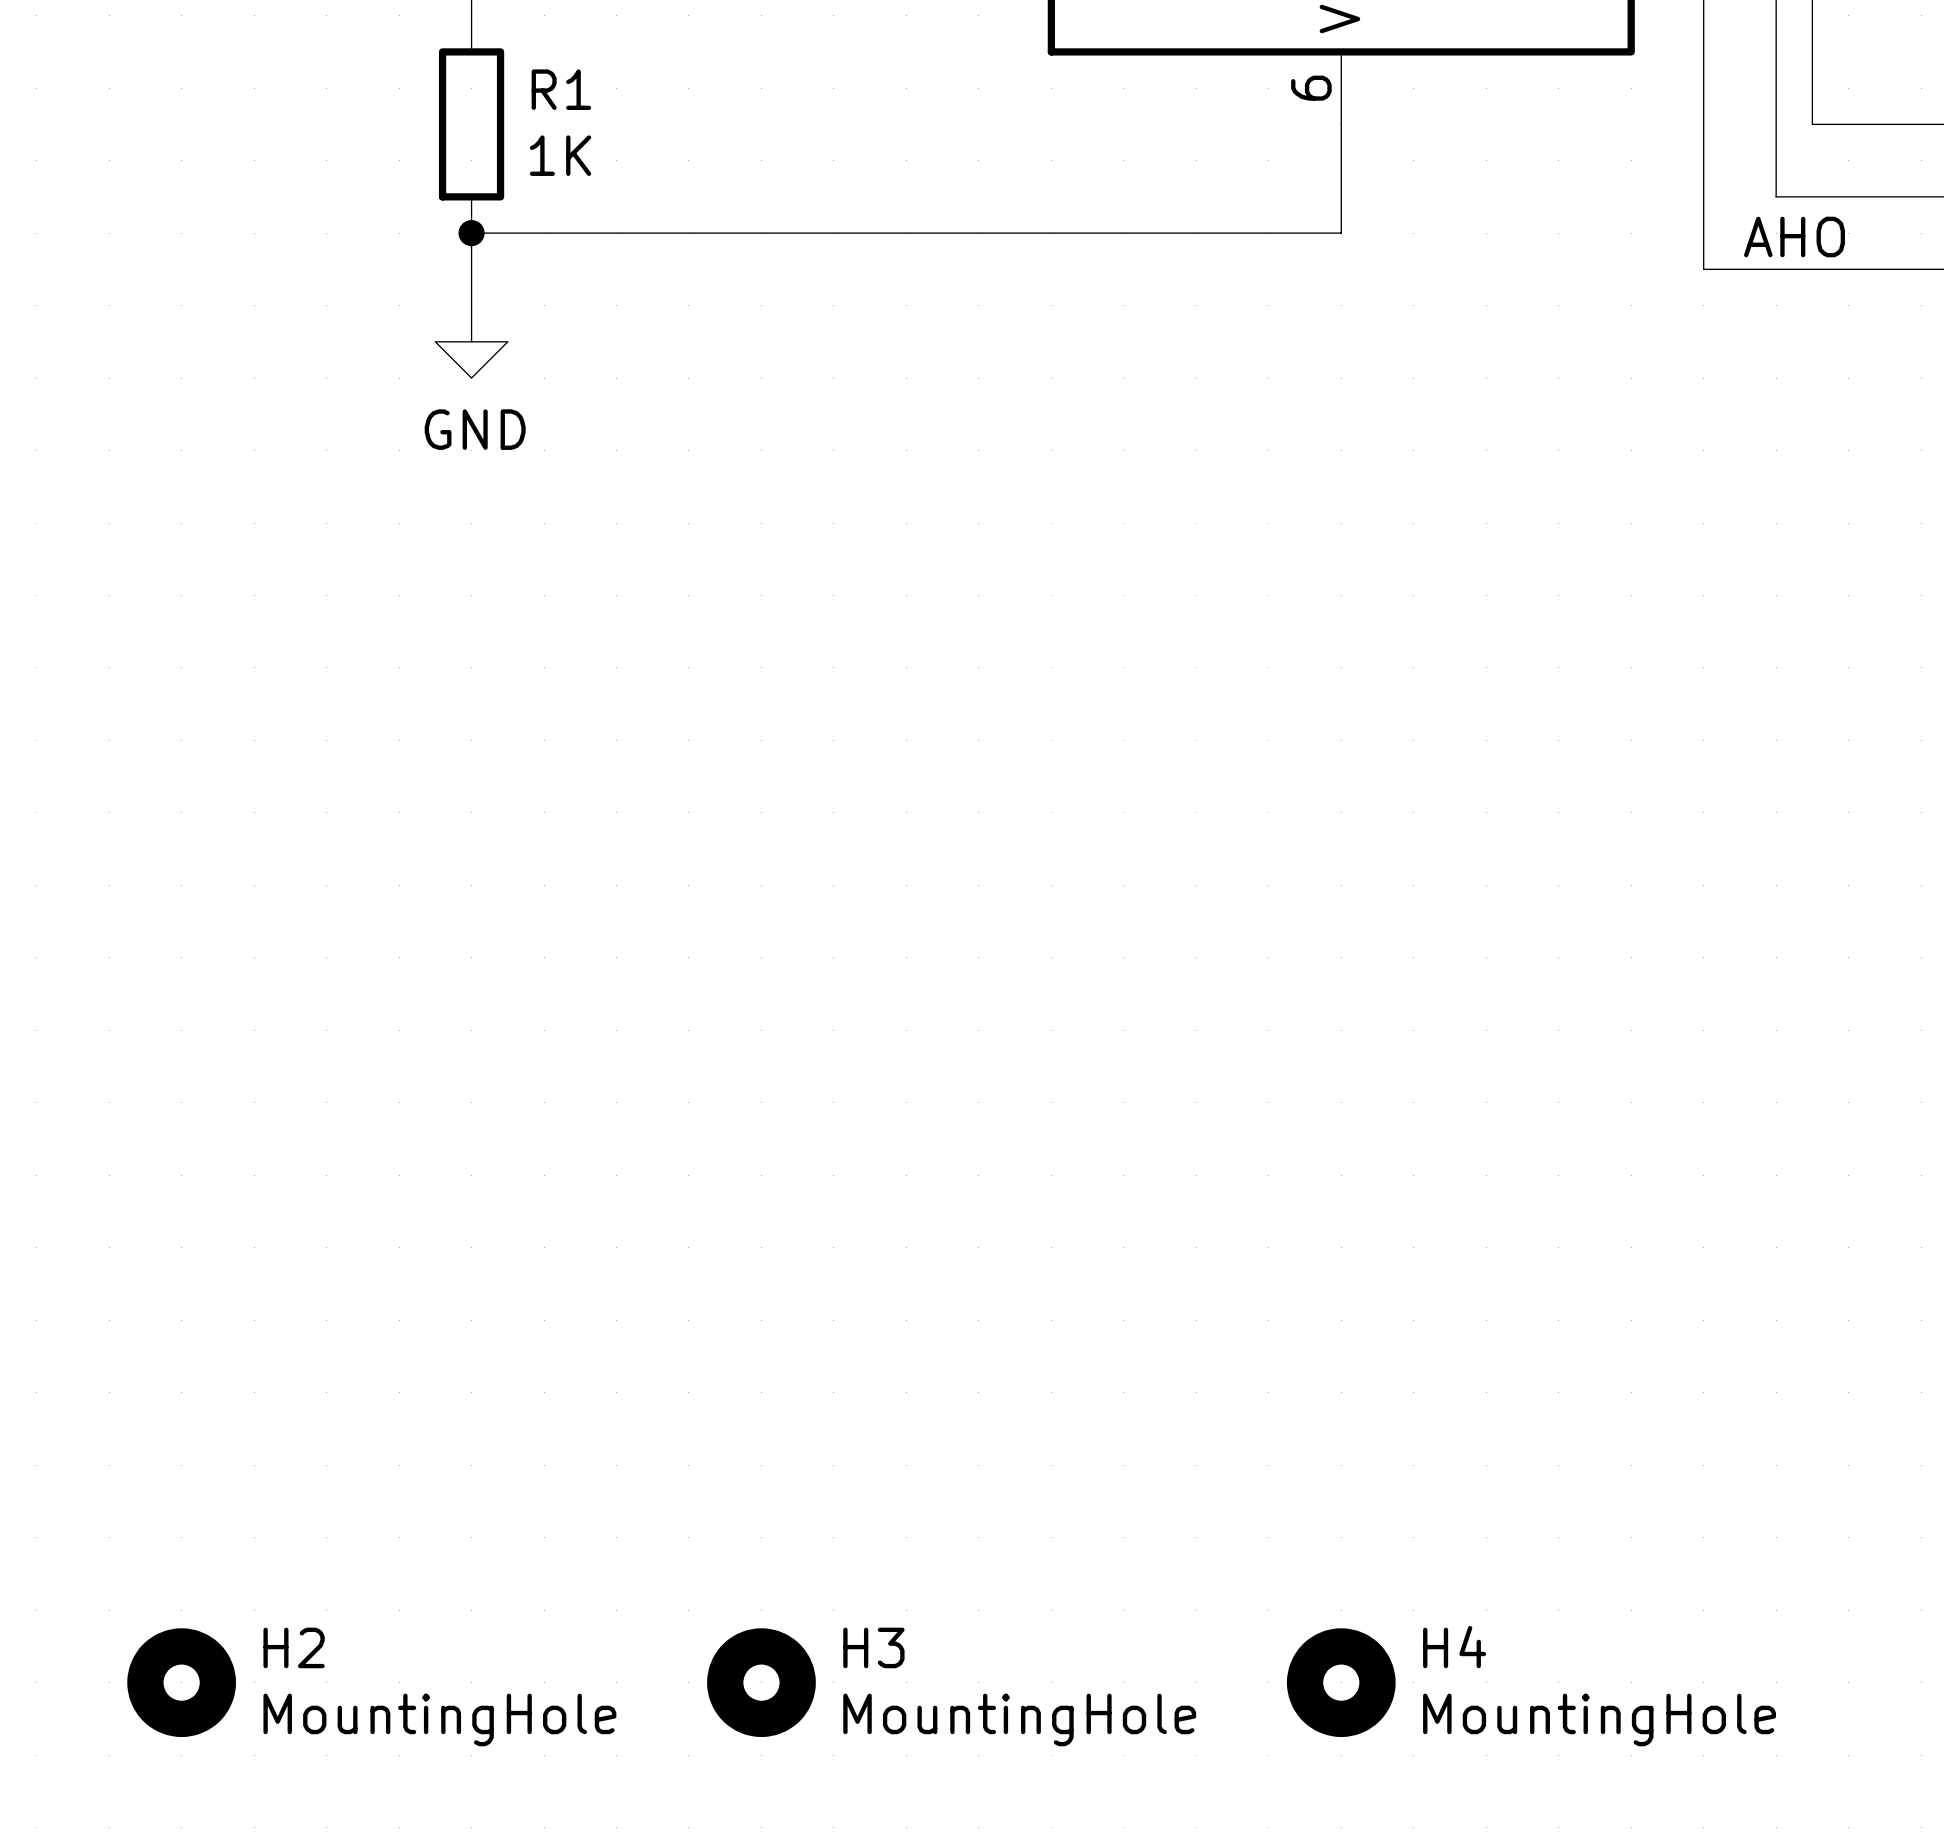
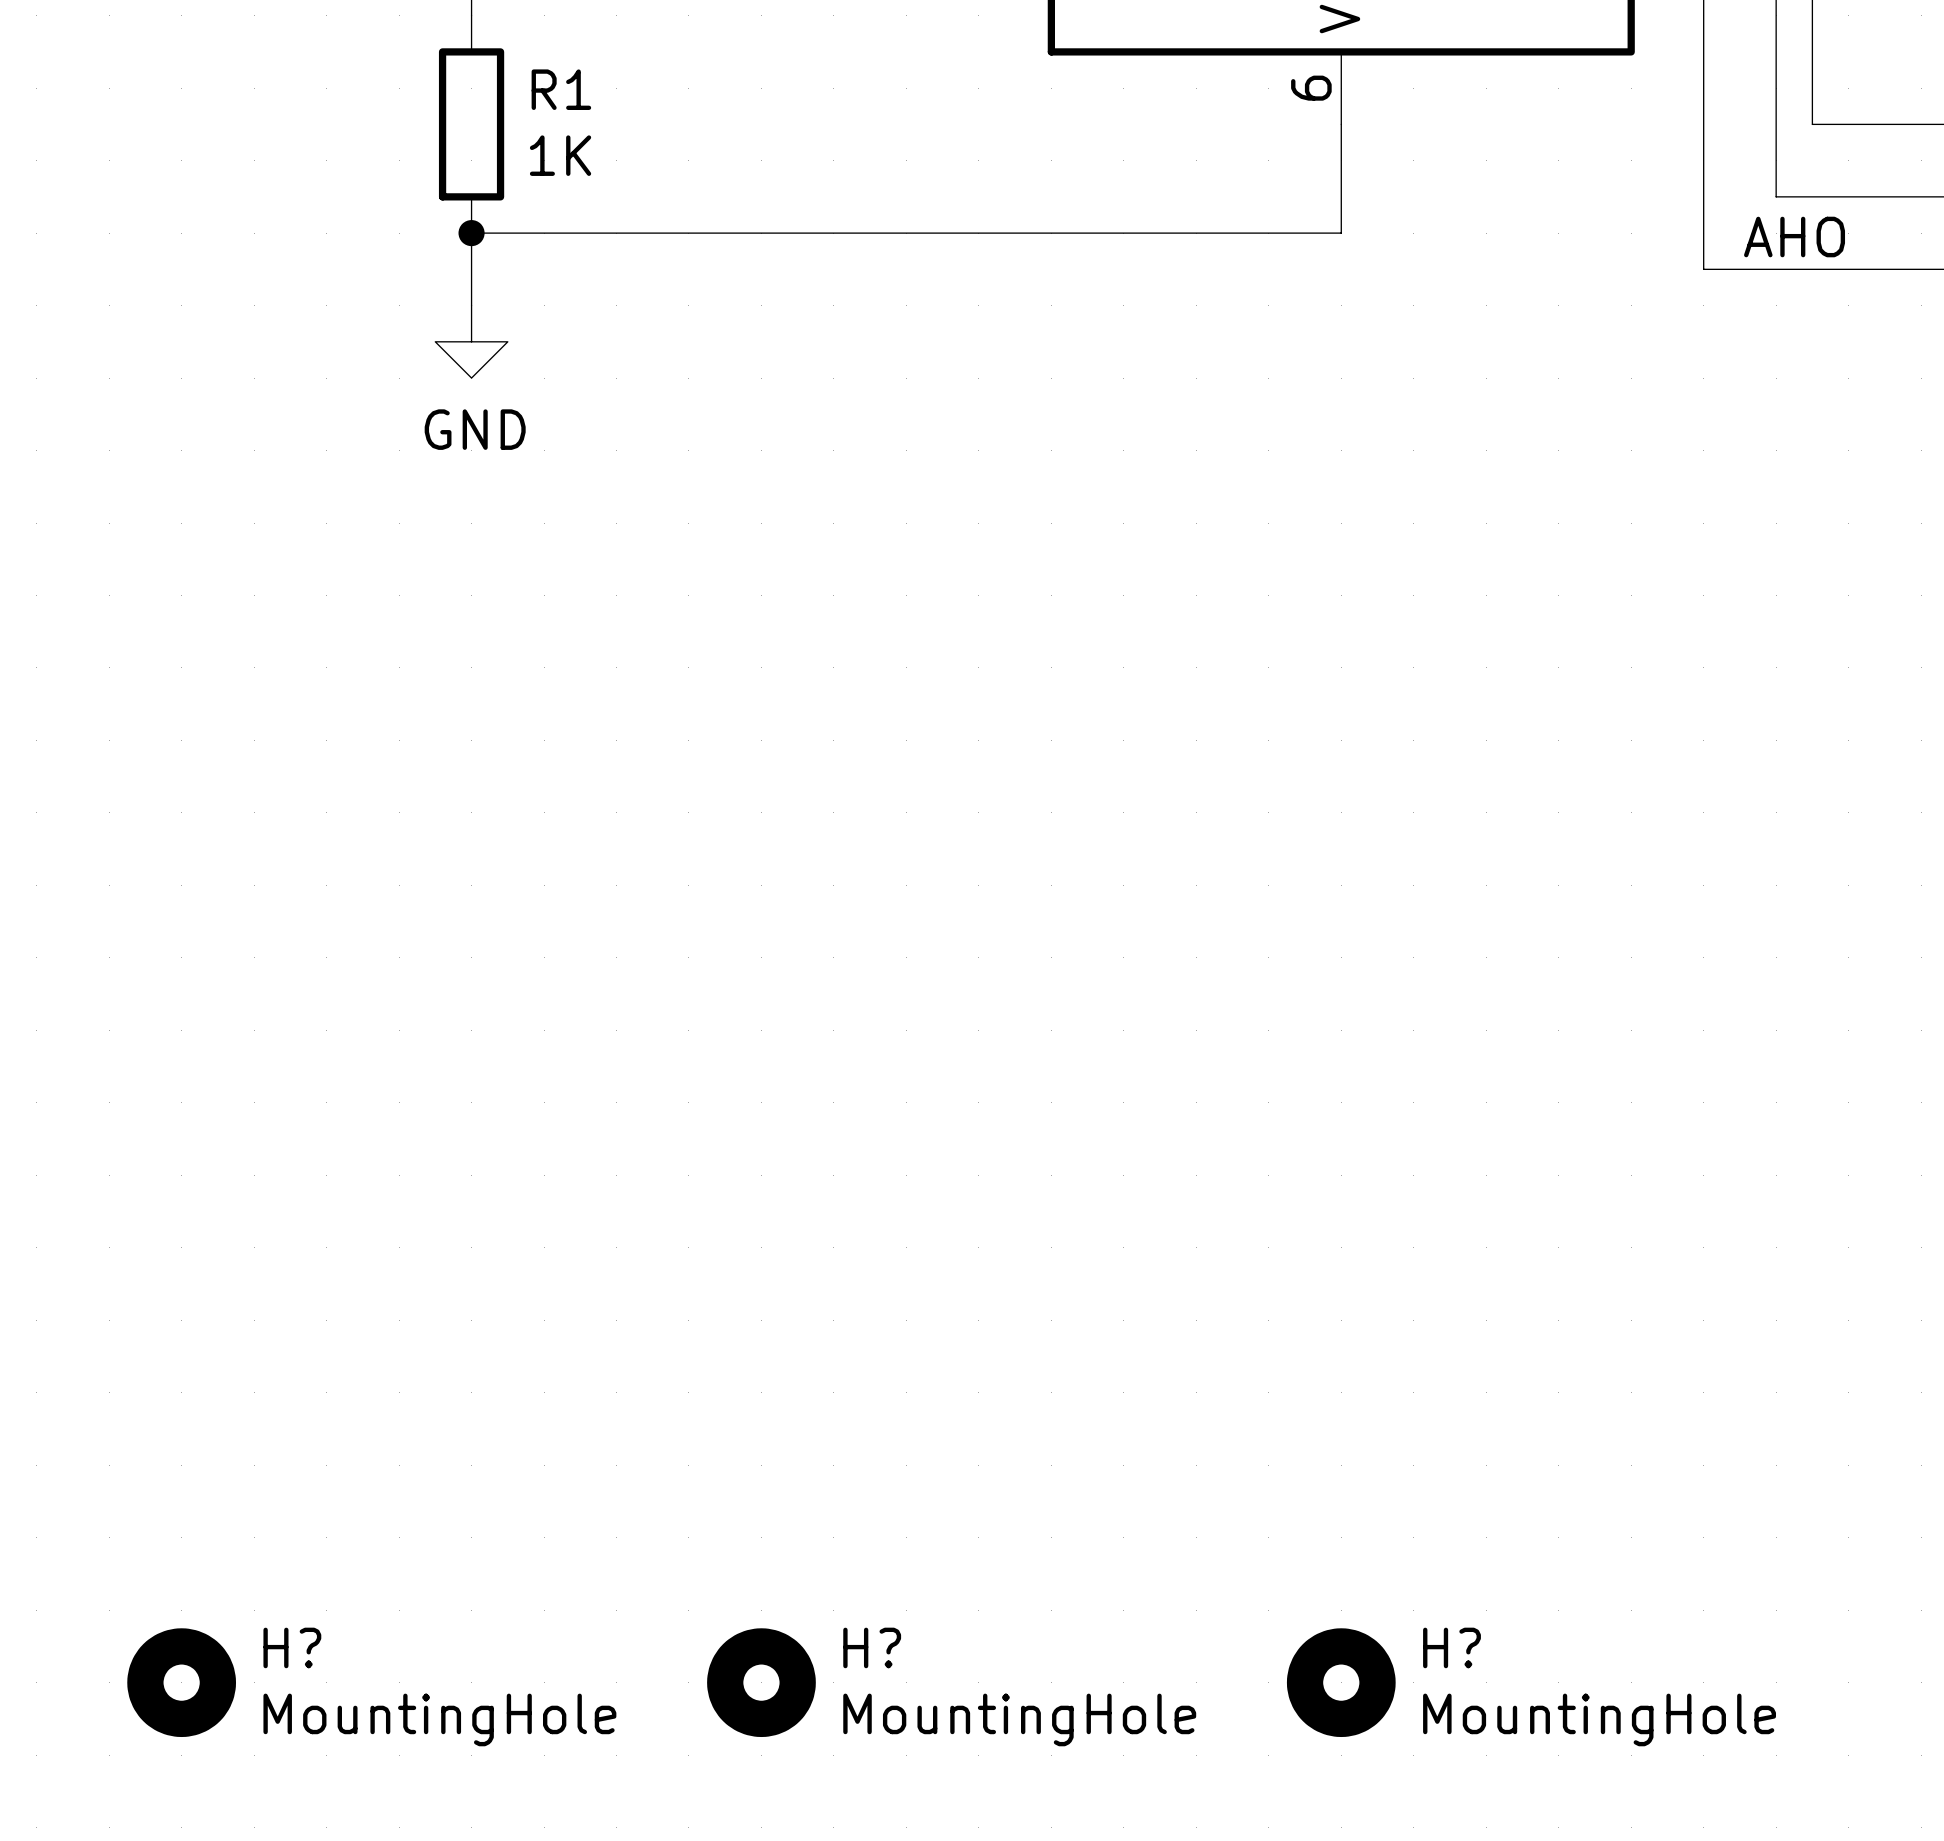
H2 name: H2 (294, 1647) -> H? (292, 1647)
H3 name: H3 (873, 1647) -> H? (872, 1647)
H4 name: H4 (1454, 1647) -> H? (1452, 1647)

